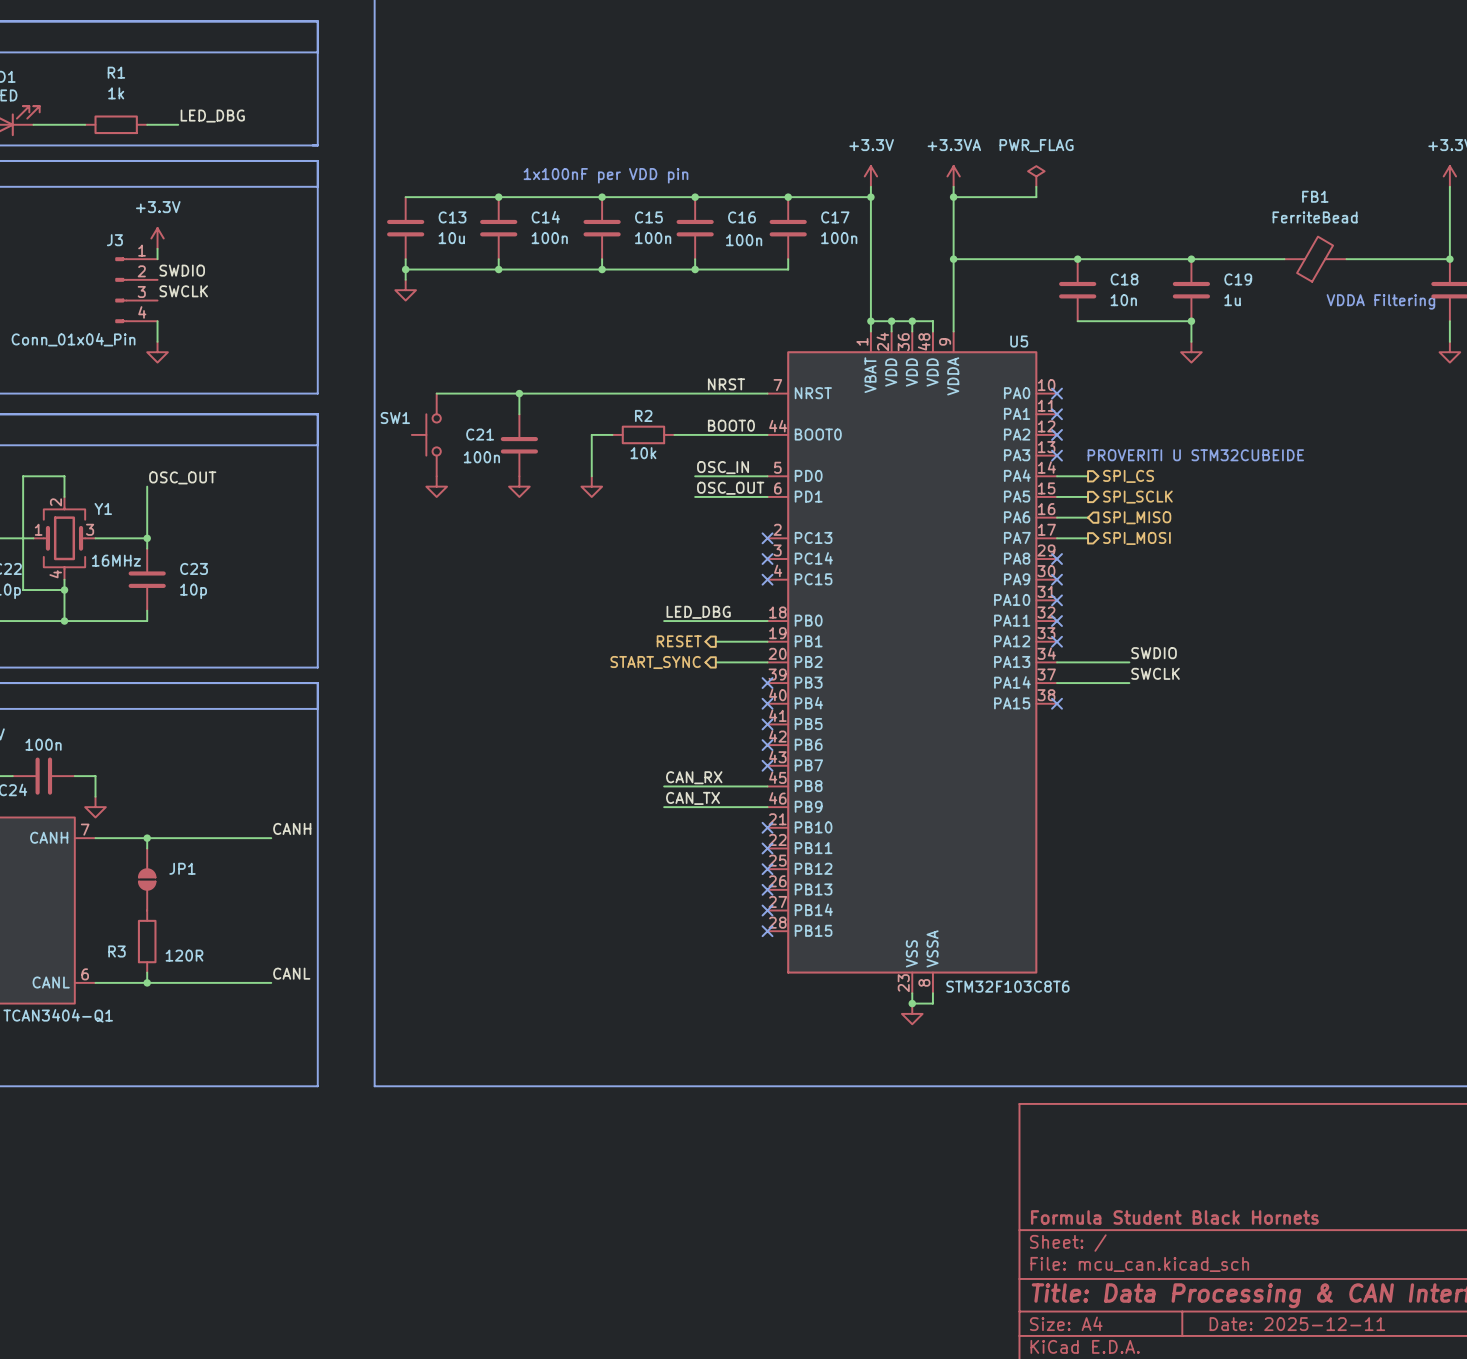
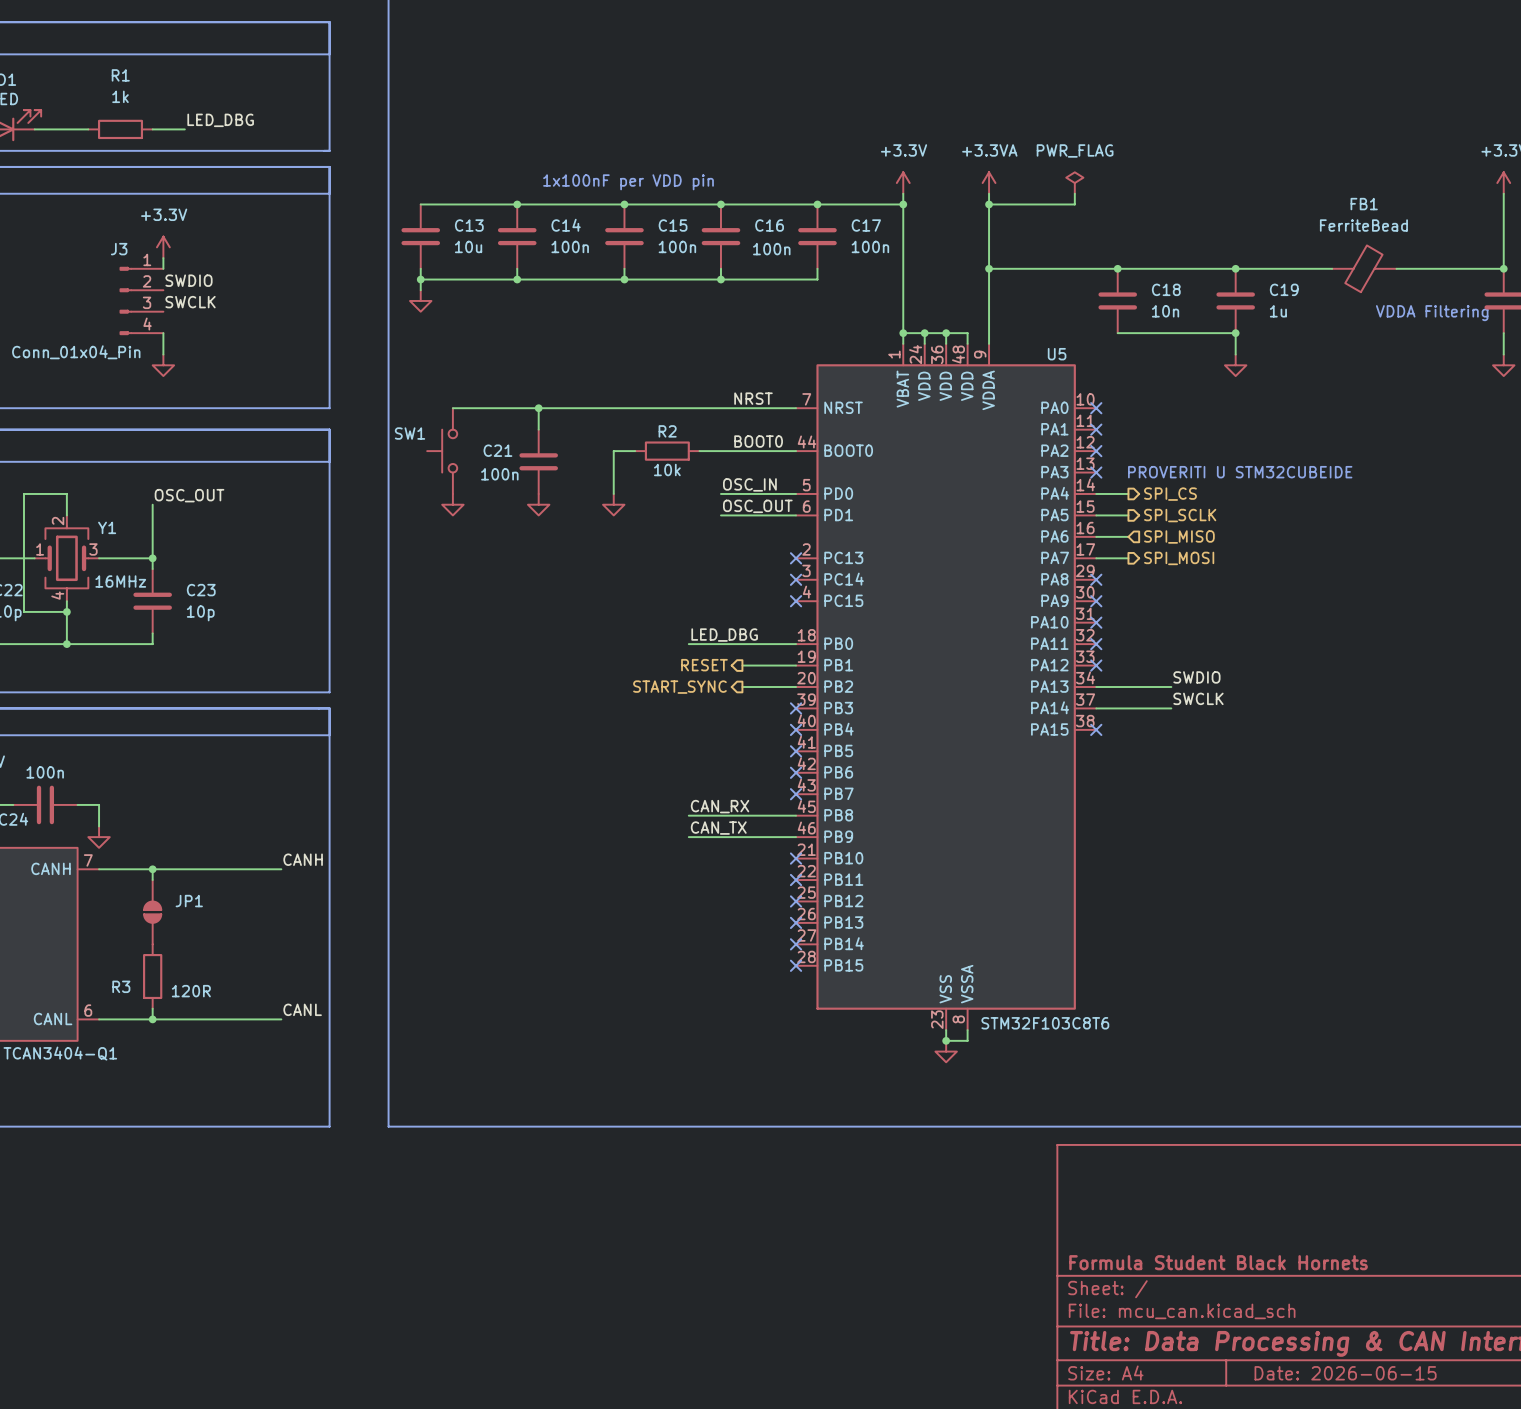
title block: Date: 2025-12-11 (1297, 1324) -> Date: 2026-06-15 (1345, 1373)

